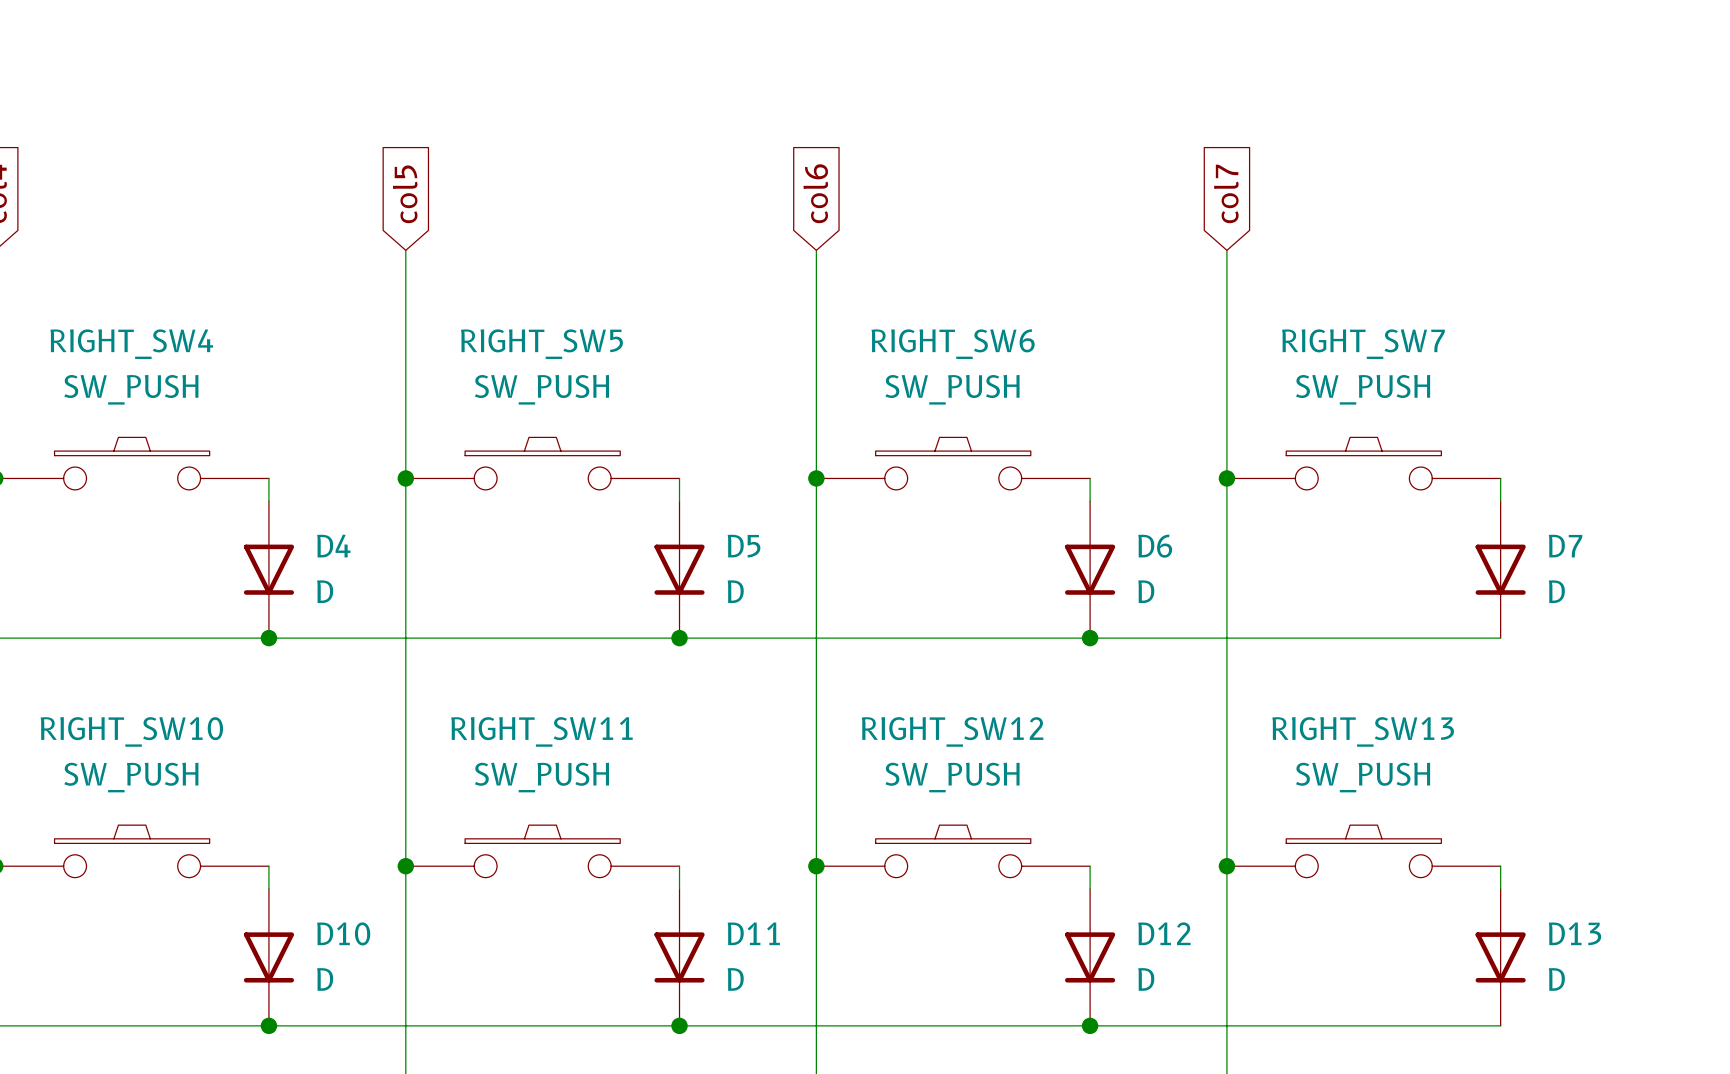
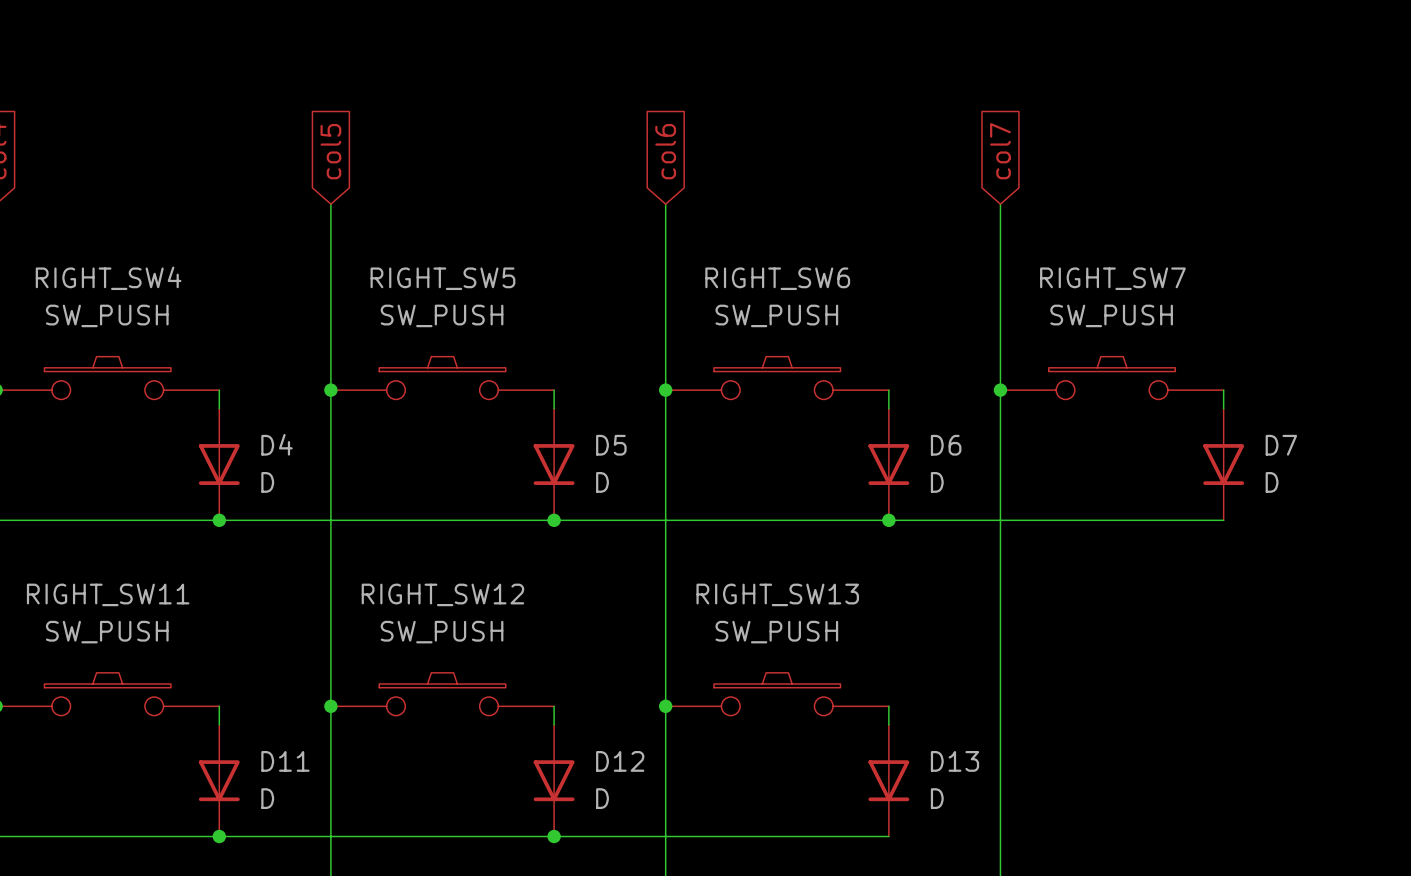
RIGHT_SW10 name: RIGHT_SW10 (131, 731) -> RIGHT_SW11 (108, 594)
RIGHT_SW11 name: RIGHT_SW11 (541, 731) -> RIGHT_SW12 (442, 594)
RIGHT_SW12 name: RIGHT_SW12 (952, 731) -> RIGHT_SW13 (777, 594)
RIGHT_SW13: SW_PUSH (1363, 851) -> none
junction: (1226, 866) -> none
wire: (1500, 866) (1500, 889) -> none
D10 name: D10 (343, 933) -> D11 (285, 761)
D11 name: D11 (753, 933) -> D12 (620, 761)
D12 name: D12 (1164, 933) -> D13 (954, 761)
D13: D (1500, 957) -> none
wire: (1090, 1025) (1500, 1025) -> none
junction: (1090, 1025) -> none

